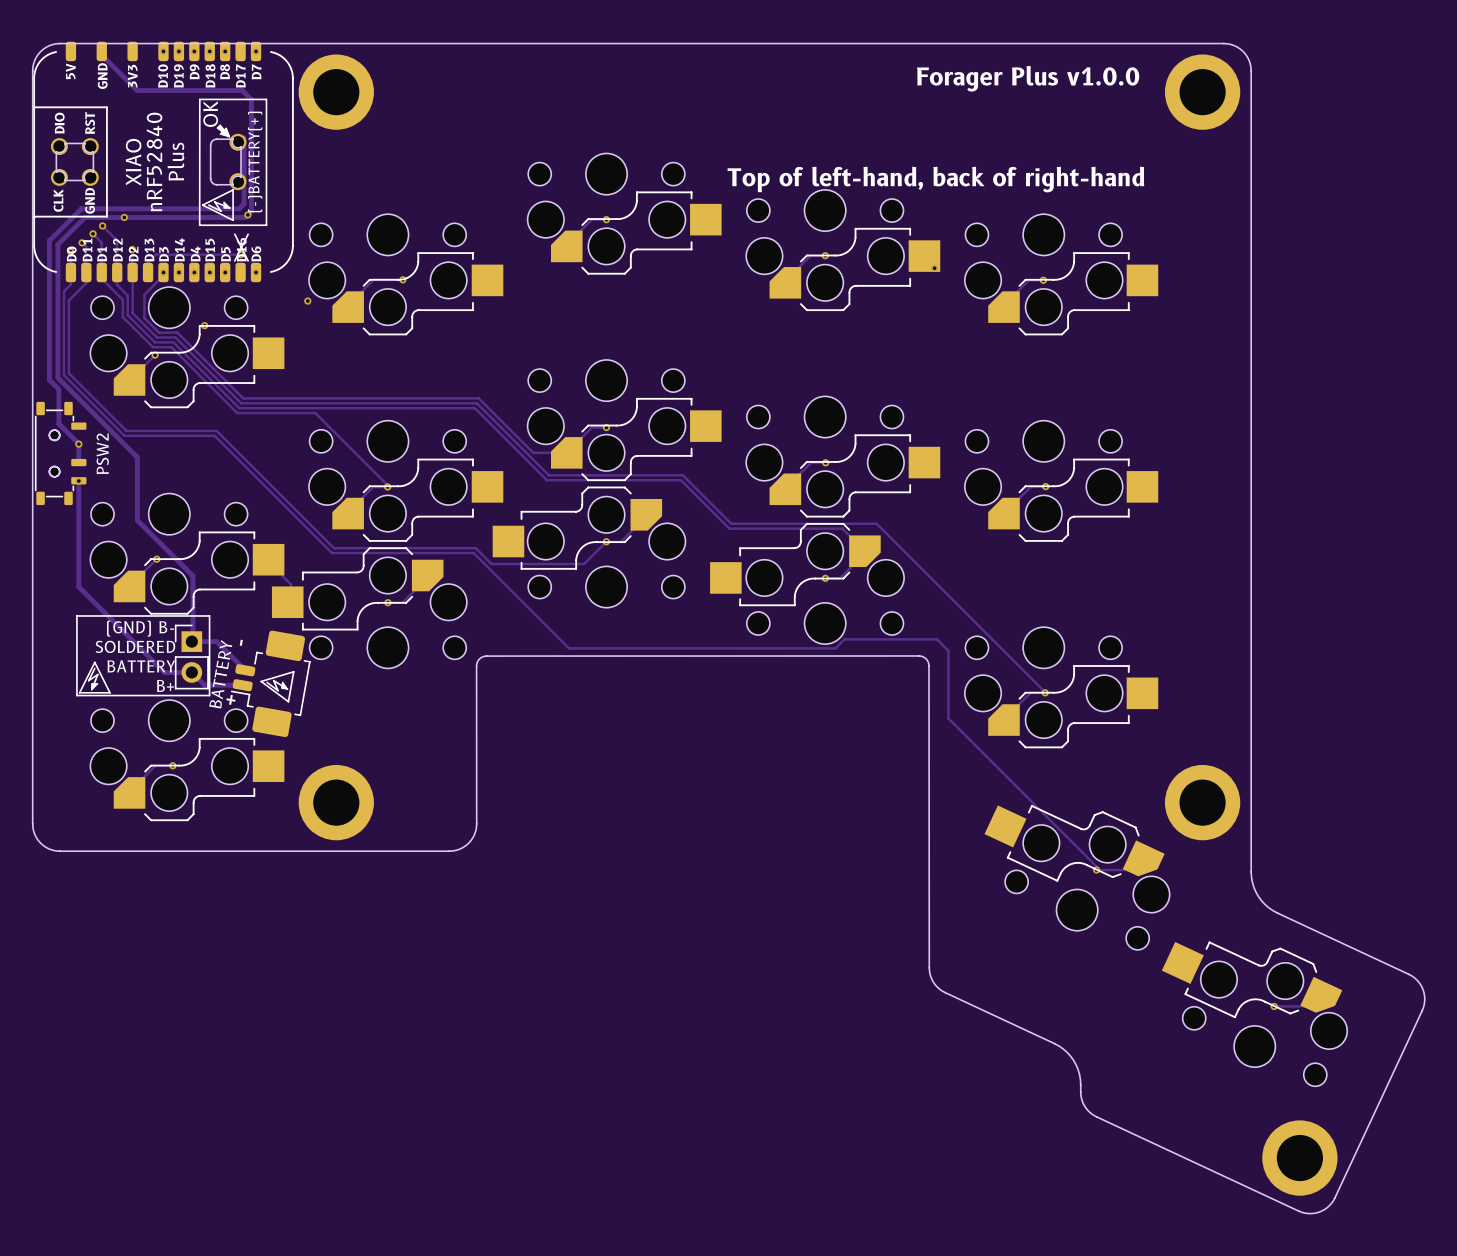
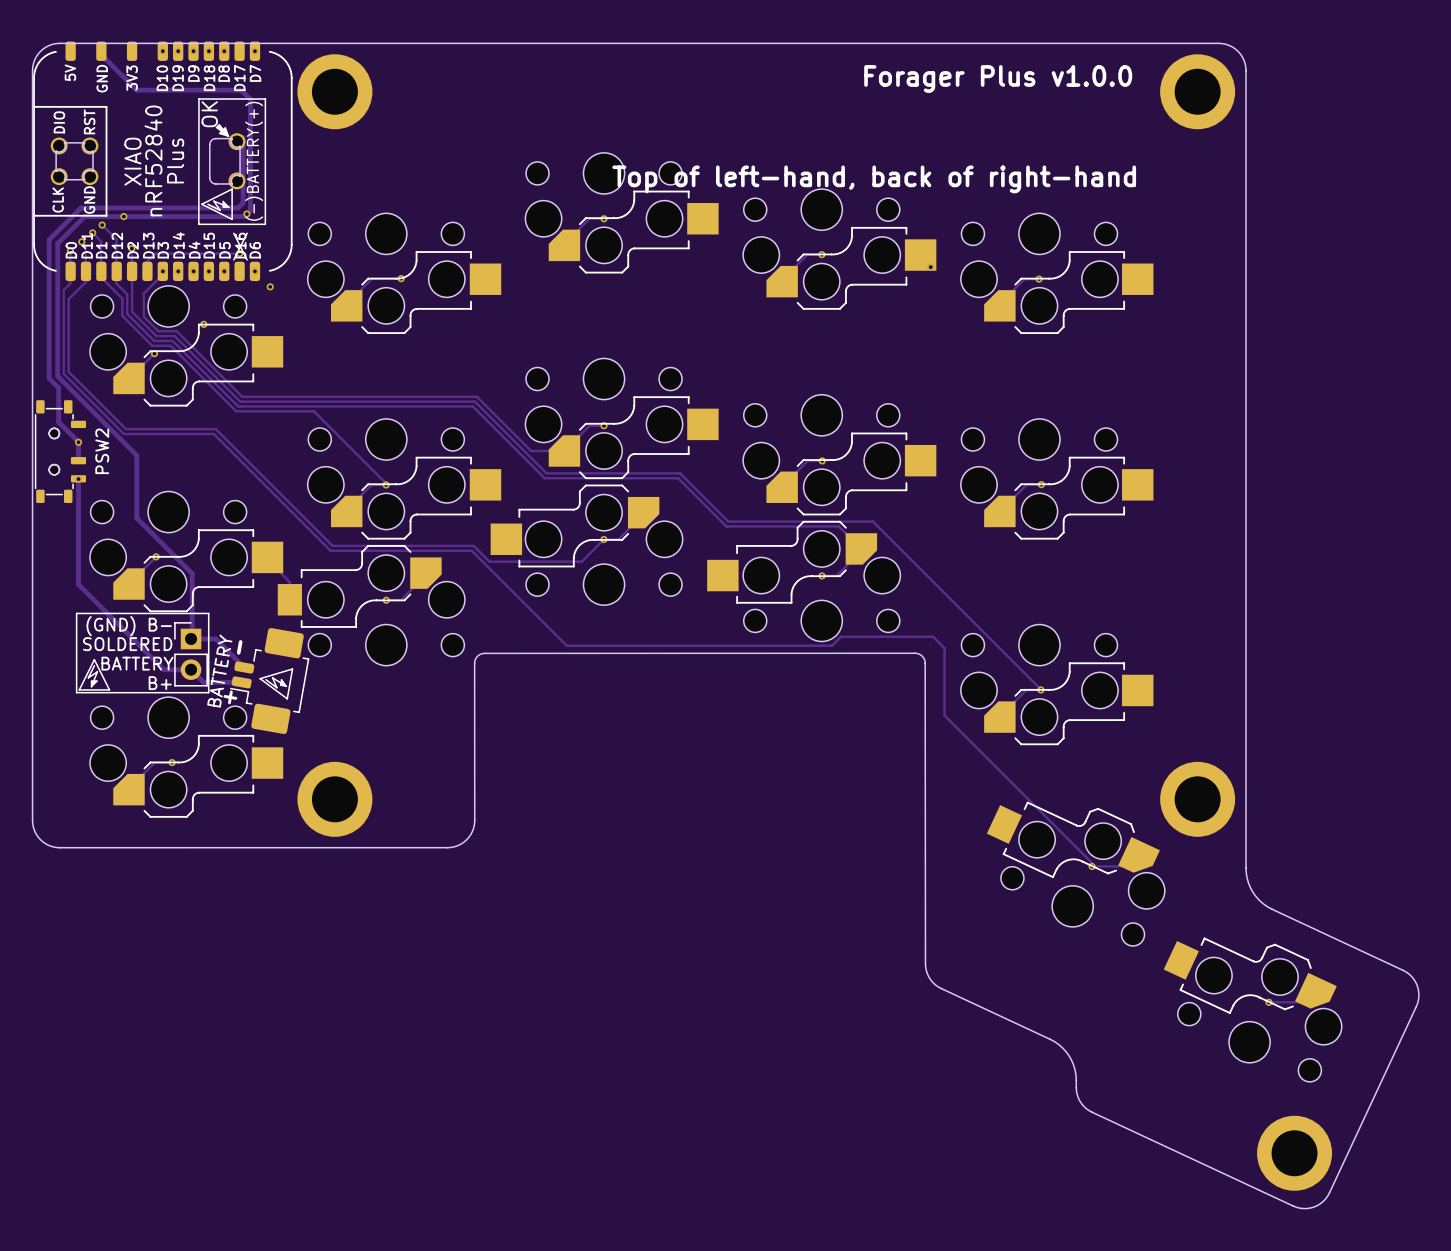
via position: (307, 301) -> (270, 286)
part footprint: [271, 547, 467, 669] -> [277, 545, 465, 666]
part footprint: [984, 805, 1170, 950] -> [986, 801, 1165, 946]
part footprint: [1161, 941, 1348, 1087] -> [1163, 937, 1342, 1082]

